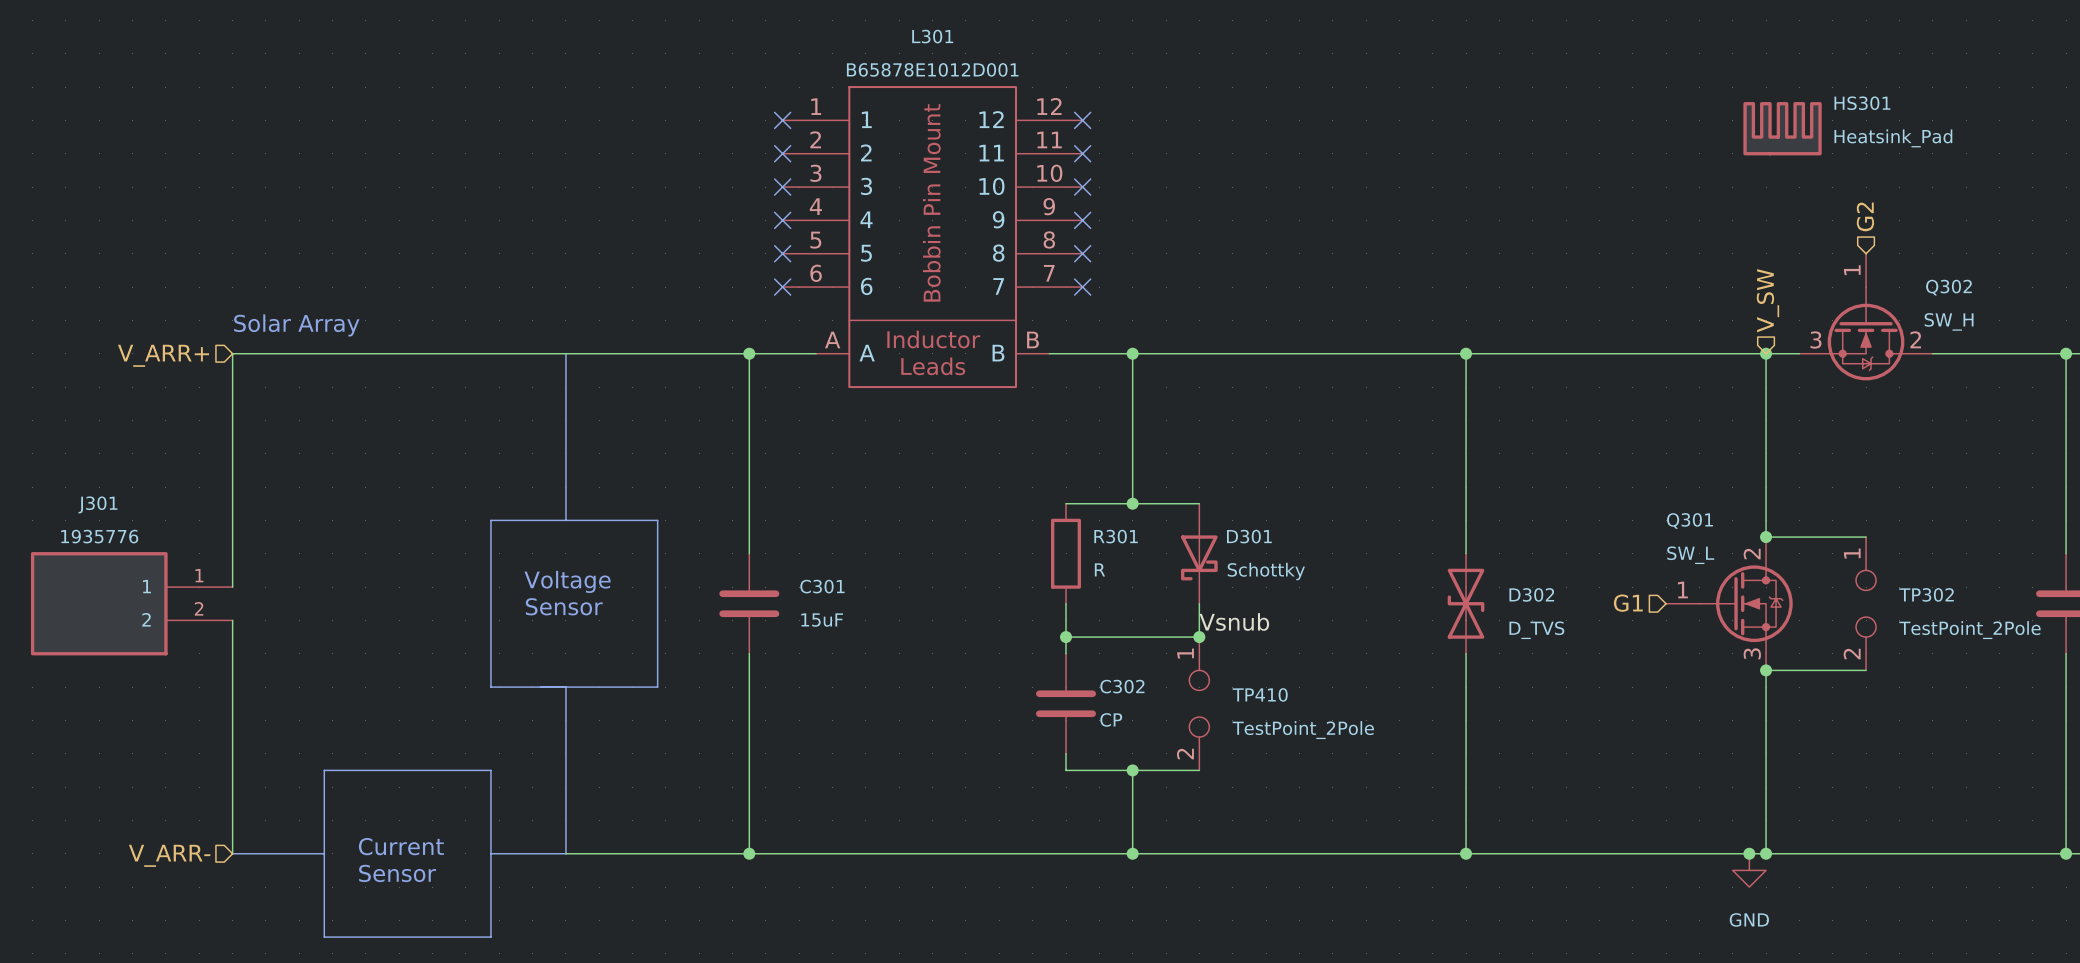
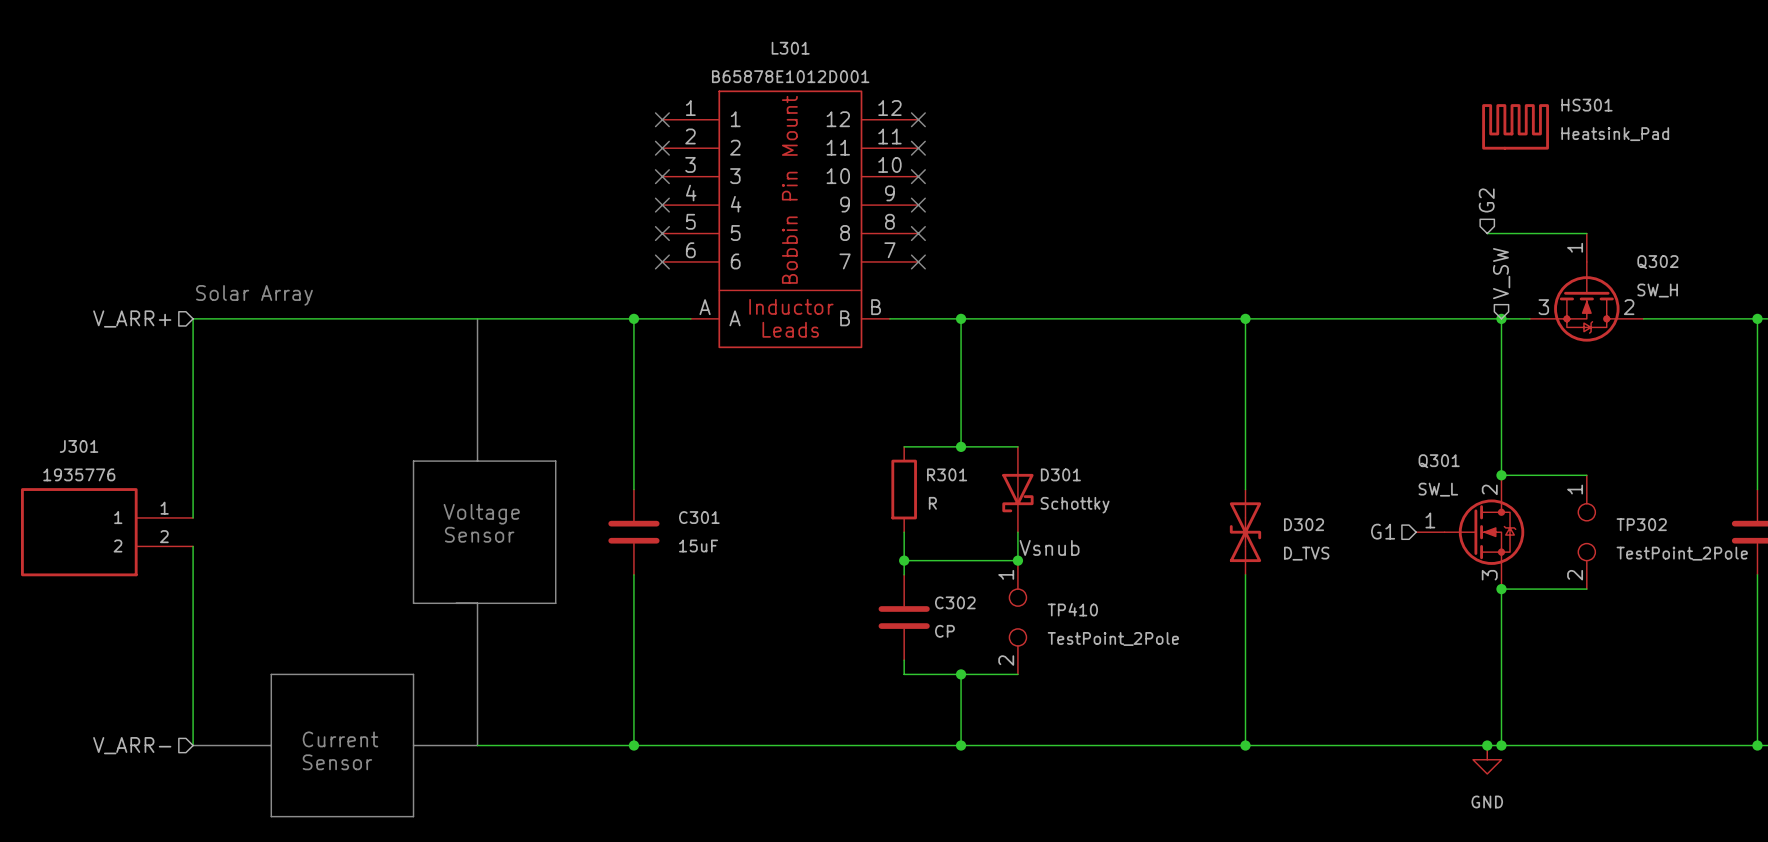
hierarchical label position: G2 (1865, 216) -> G2 (1486, 200)
wire: none -> (1487, 233) (1586, 233)

